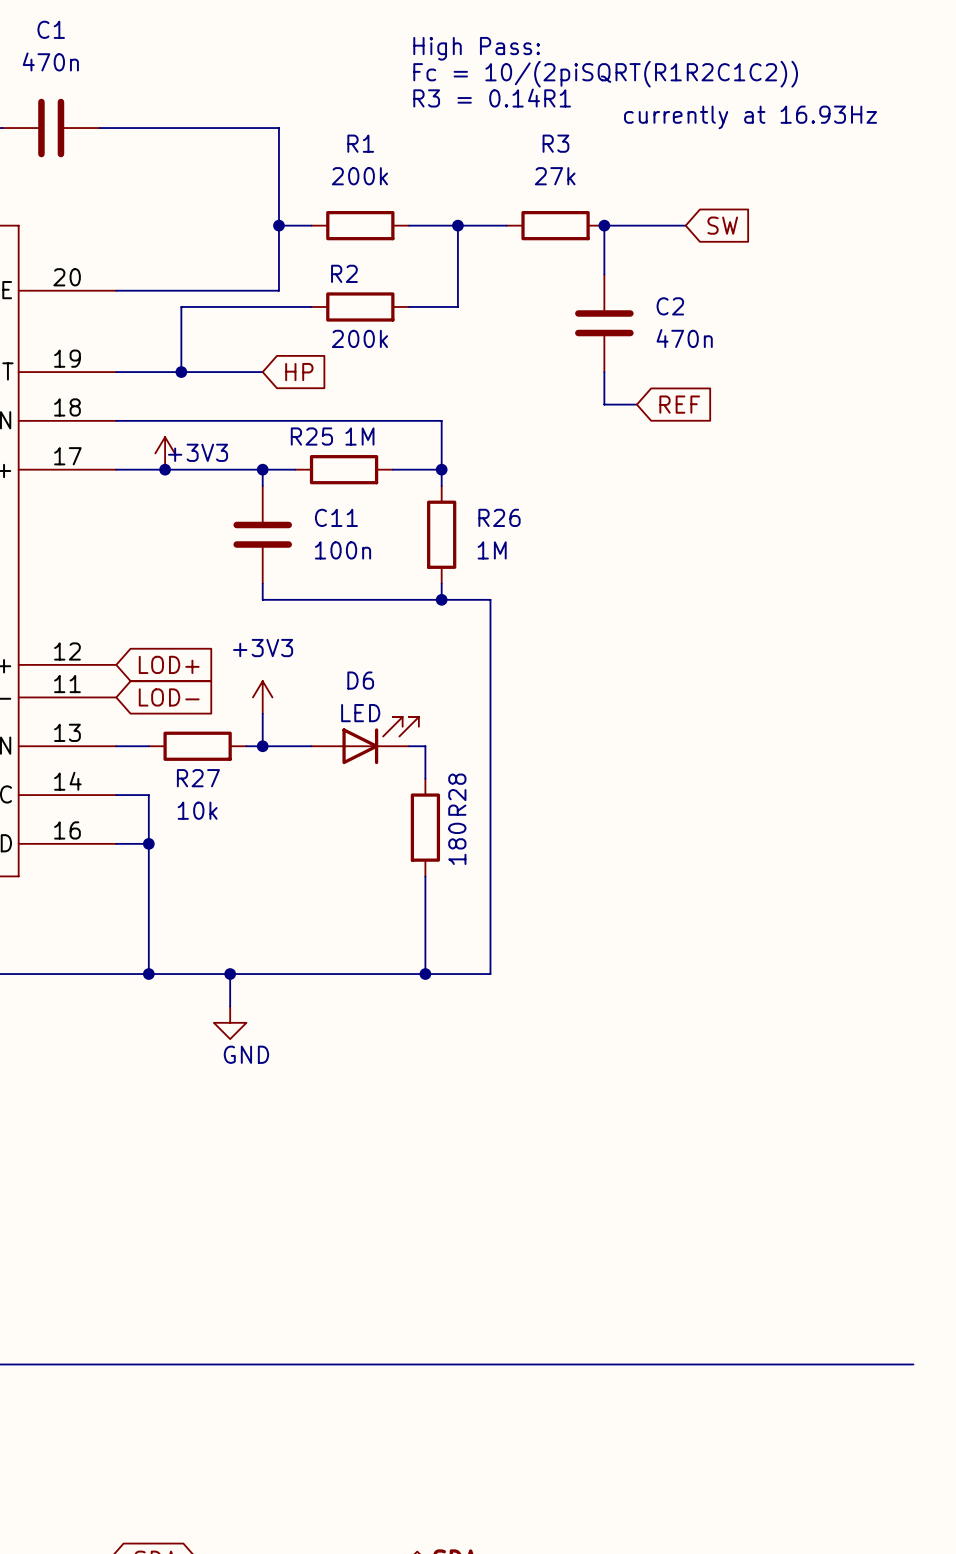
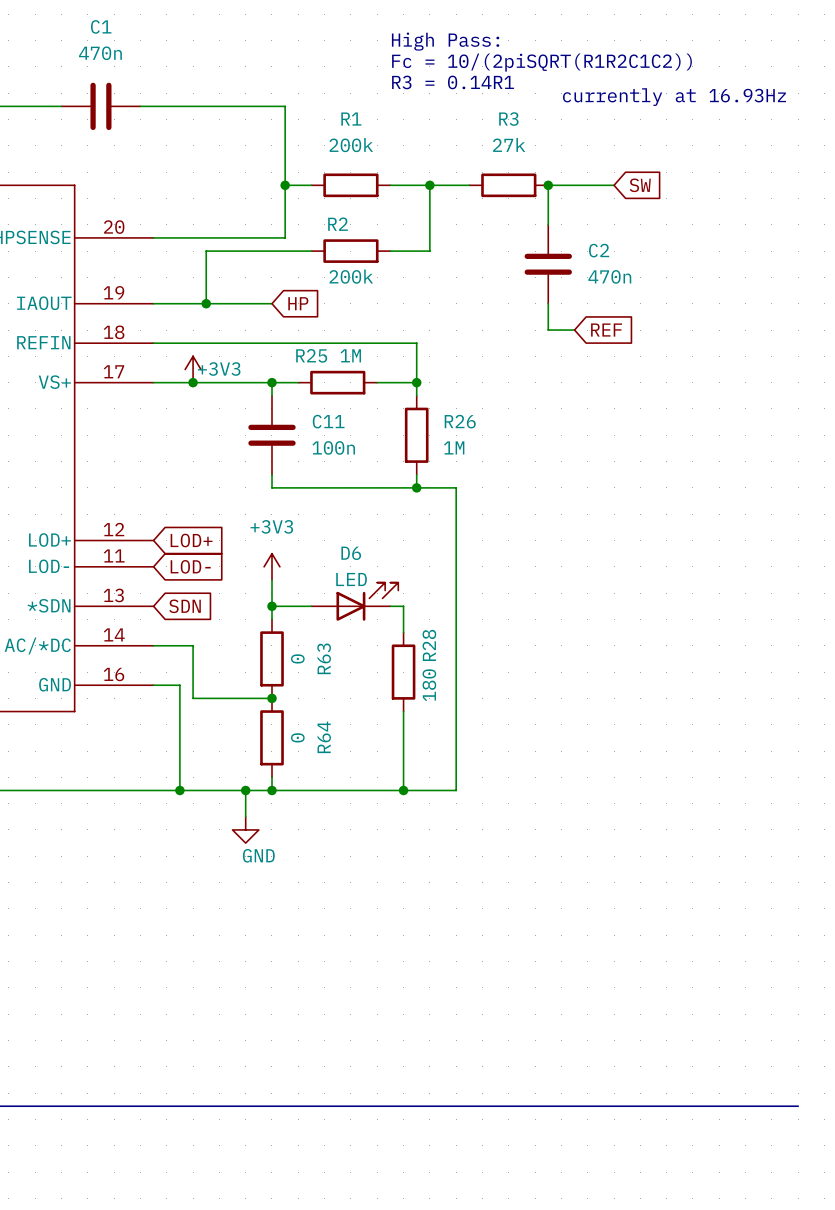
wire: (116, 746) (148, 746) -> none
global label: none -> SDN (185, 606)
R27: 10k (197, 746) -> none
wire: (246, 746) (262, 746) -> (271, 619) (271, 606)
wire: (148, 795) (148, 843) -> (179, 645) (193, 645) (193, 698) (271, 698)
R63: none -> 0 (271, 658)
junction: (148, 843) -> none
junction: none -> (271, 698)
R64: none -> 0 (271, 737)
wire: none -> (271, 777) (271, 790)
junction: none -> (271, 790)

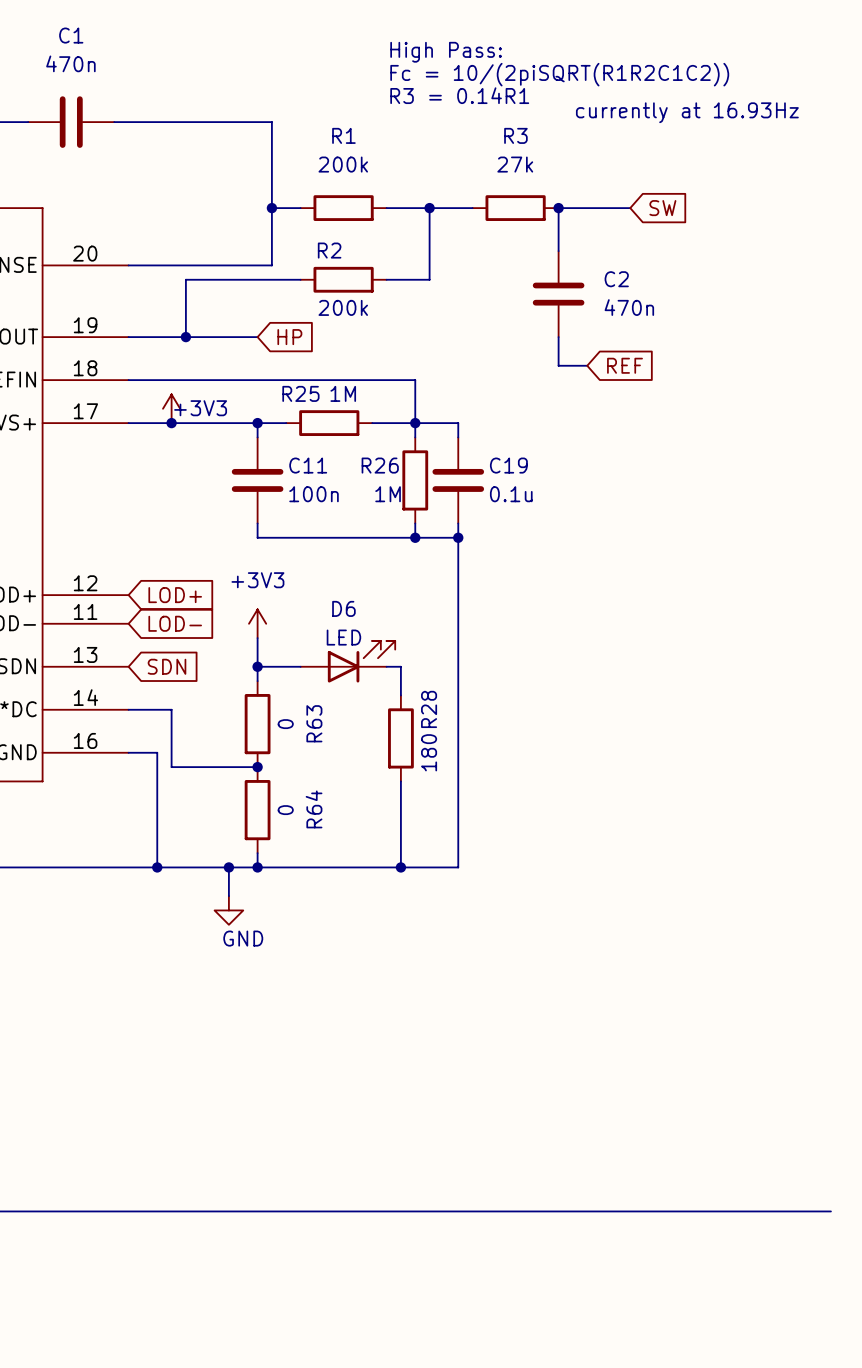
wire: none -> (415, 423) (458, 423) (458, 437)
C11 name position: C11 (328, 421) -> C11 (308, 465)
R26 name position: R26 (460, 421) -> R26 (380, 465)
C19: none -> 0.1u (458, 480)
C11 value position: 100n (333, 447) -> 100n (314, 494)
R26 value position: 1M (454, 447) -> 1M (388, 494)
wire: none -> (458, 523) (458, 537)
junction: none -> (458, 537)

